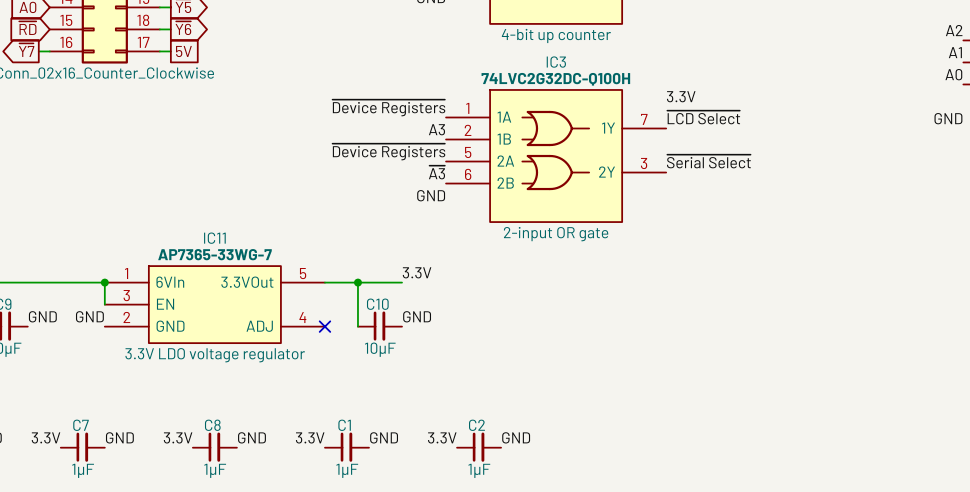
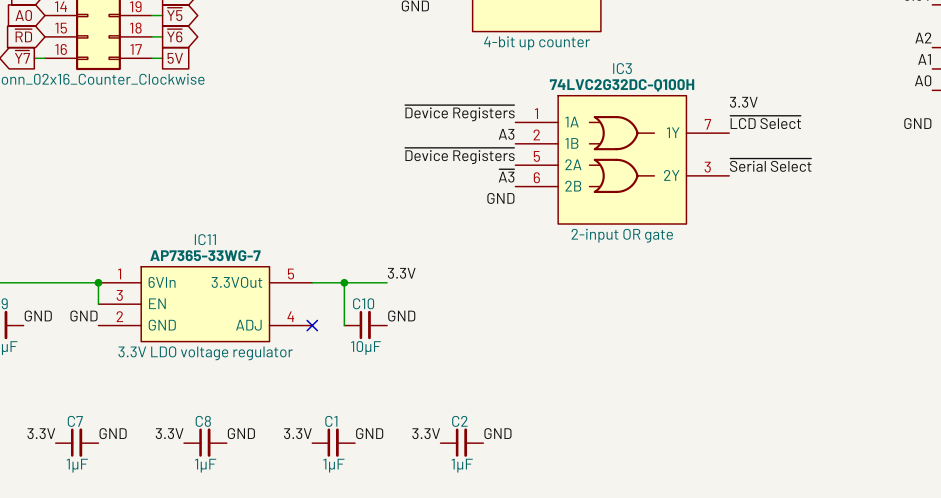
label position: 3.3V (681, 96) -> 3.3V (743, 102)
label position: ~{Device Registers} (388, 107) -> ~{Device Registers} (459, 113)
label position: ~{LCD Select} (703, 117) -> ~{LCD Select} (765, 122)
label position: A3 (436, 129) -> A3 (506, 134)
label position: ~{Device Registers} (388, 151) -> ~{Device Registers} (459, 155)
IC3 position: (556, 156) -> (622, 159)
label position: ~{Serial Select} (708, 161) -> ~{Serial Select} (770, 165)
label position: ~{A3} (436, 172) -> ~{A3} (506, 175)
label position: GND (431, 195) -> GND (500, 198)

